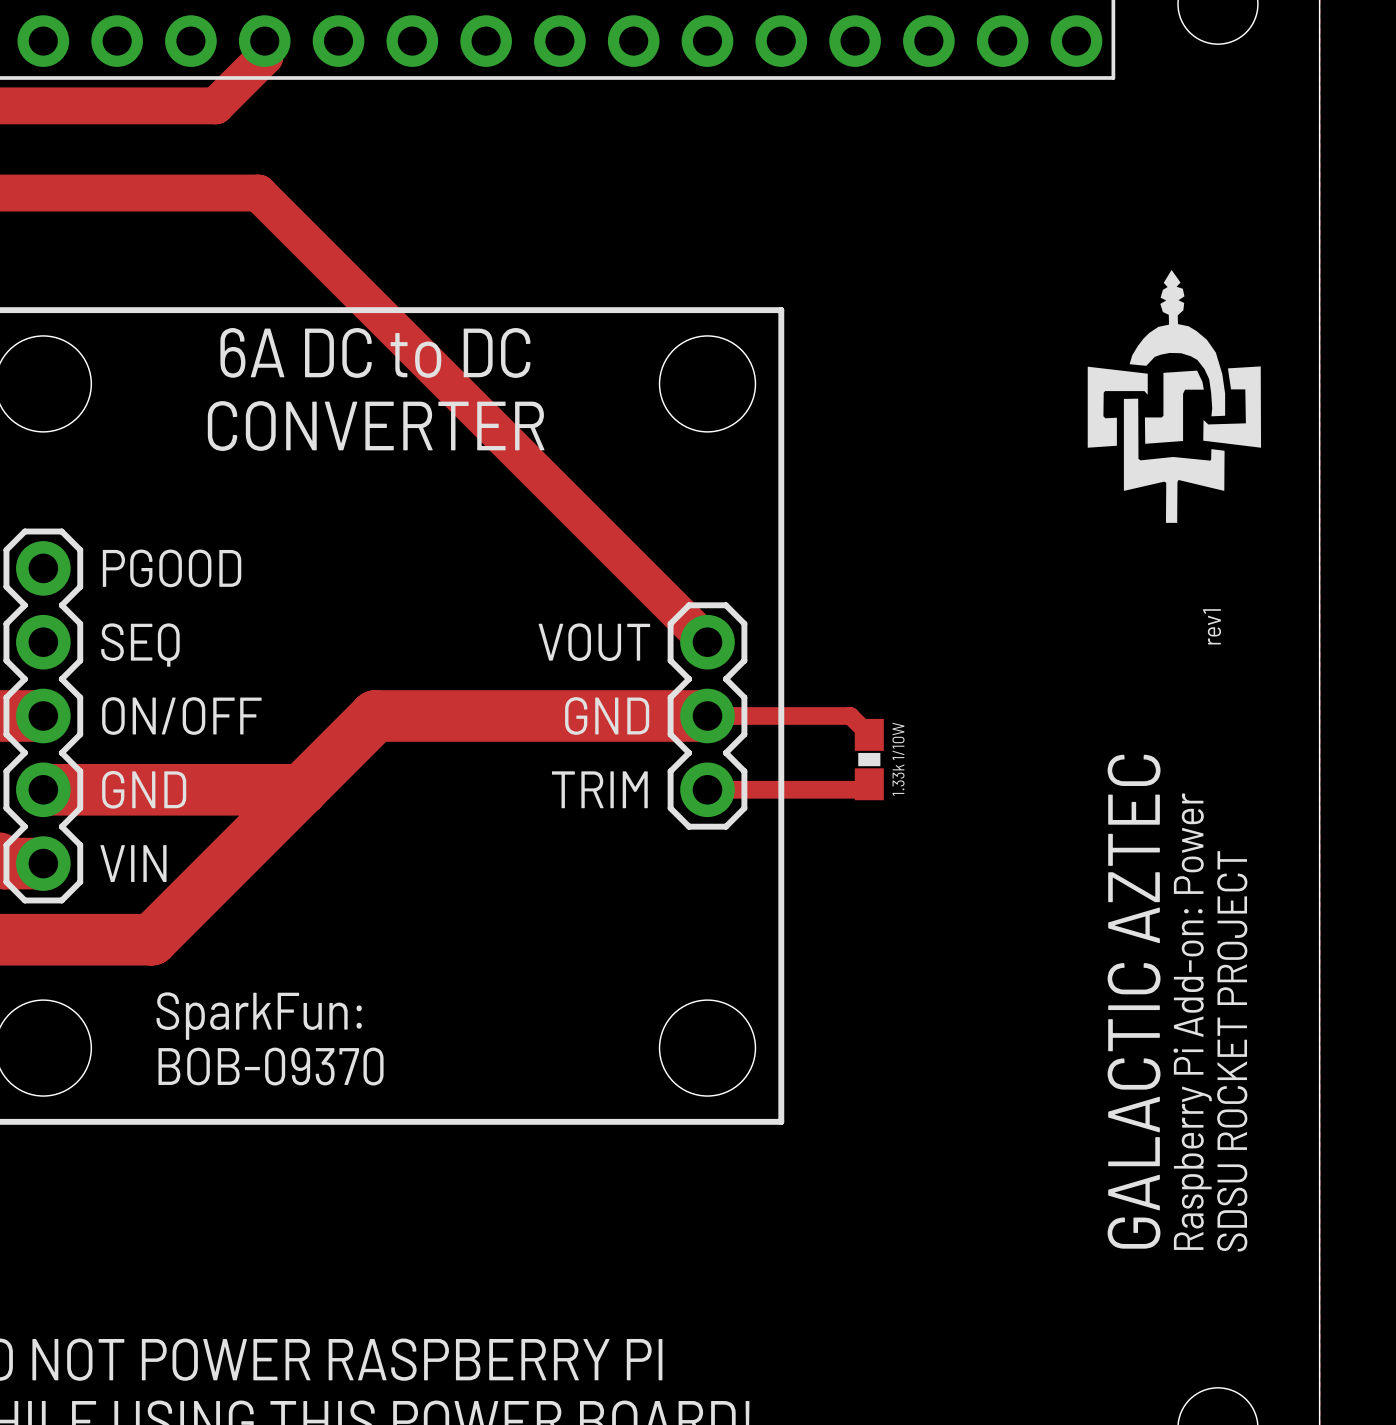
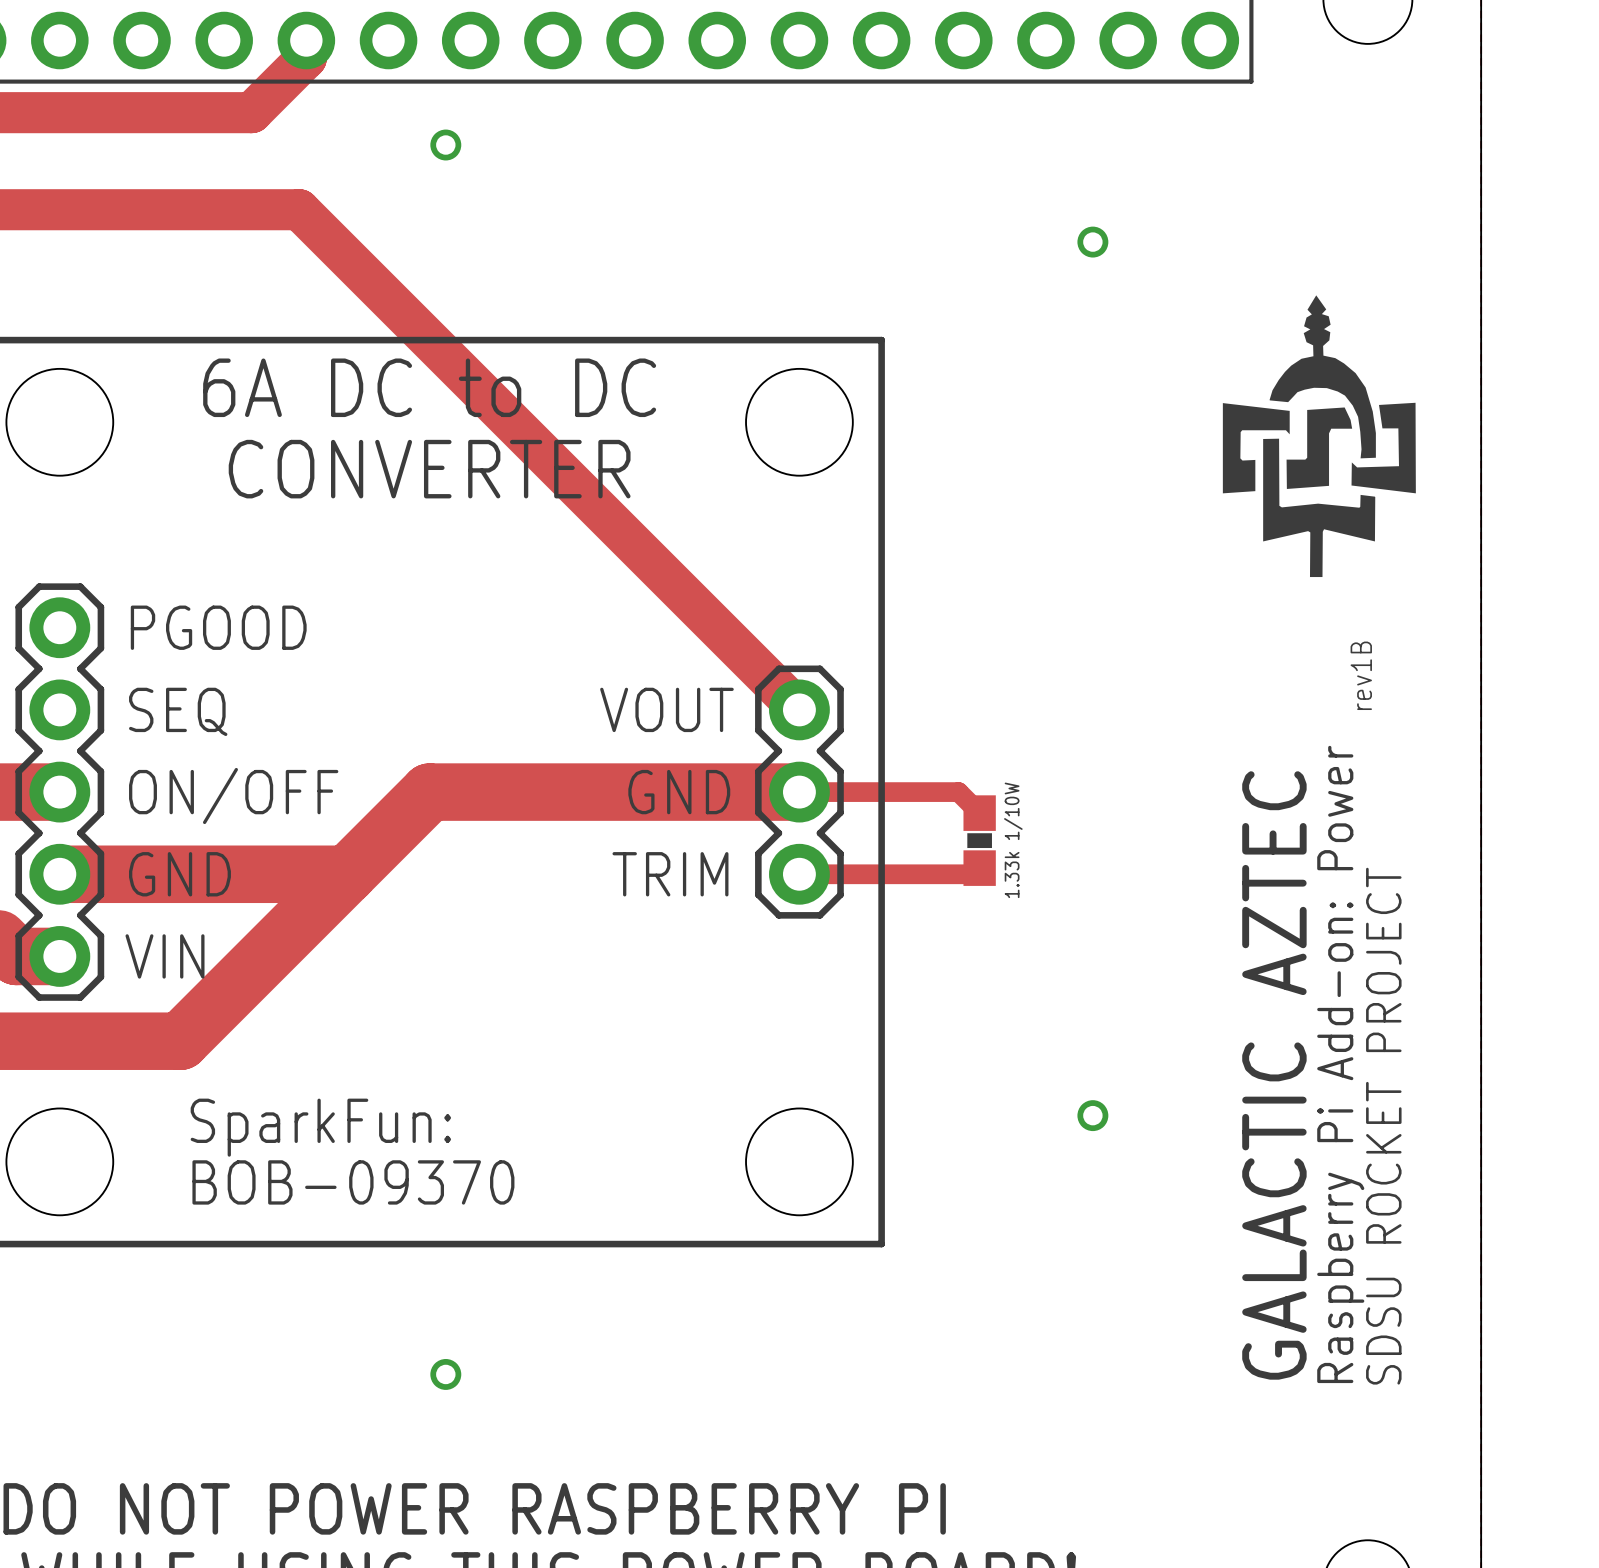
via: none -> (445, 145)
via: none -> (1092, 242)
text: rev1 (1212, 626) -> rev1B (1361, 675)
via: none -> (1092, 1115)
via: none -> (445, 1374)

